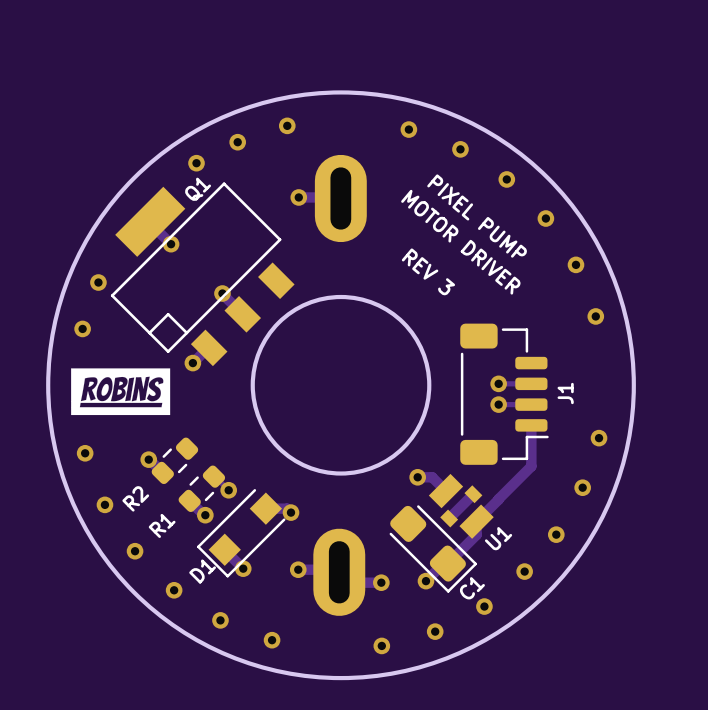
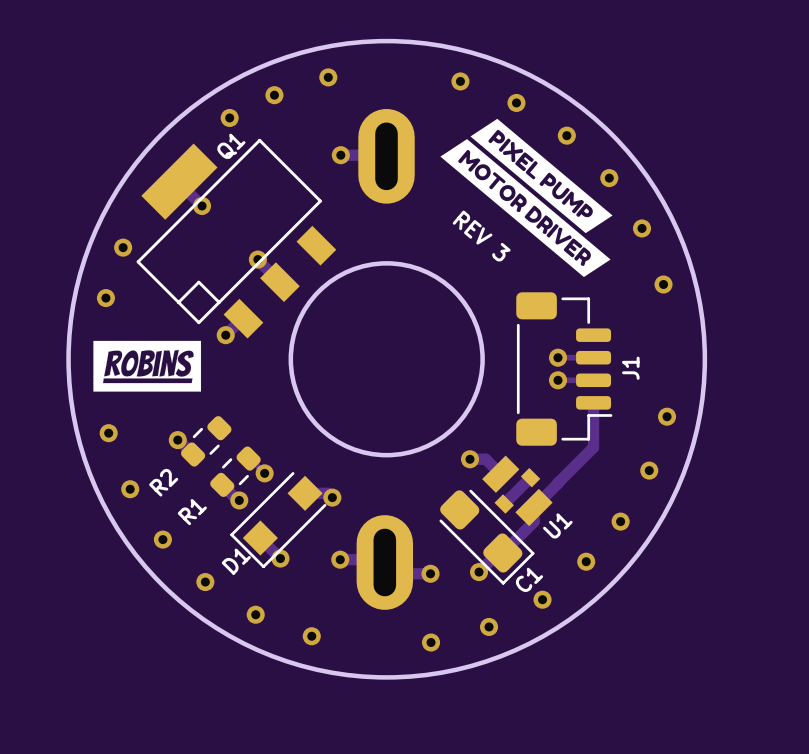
drawing: none -> [440, 118, 613, 278]
text: PIXEL PUMP (477, 216) -> none
text: MOTOR DRIVER (460, 242) -> none

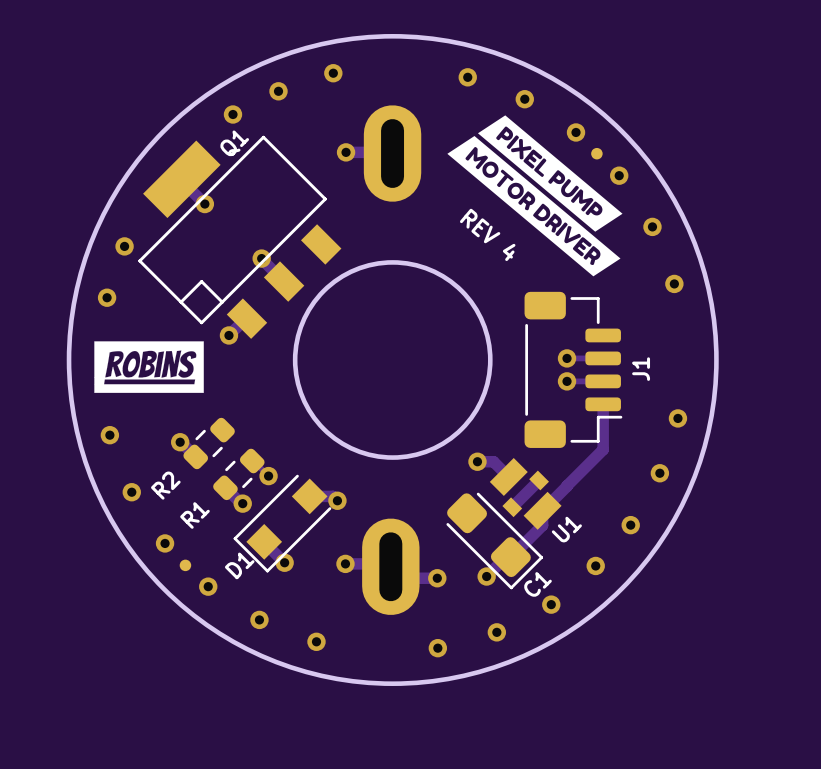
part: none -> (596, 153)
text: REV 3 (481, 236) -> REV 4 (487, 234)
part: none -> (185, 565)

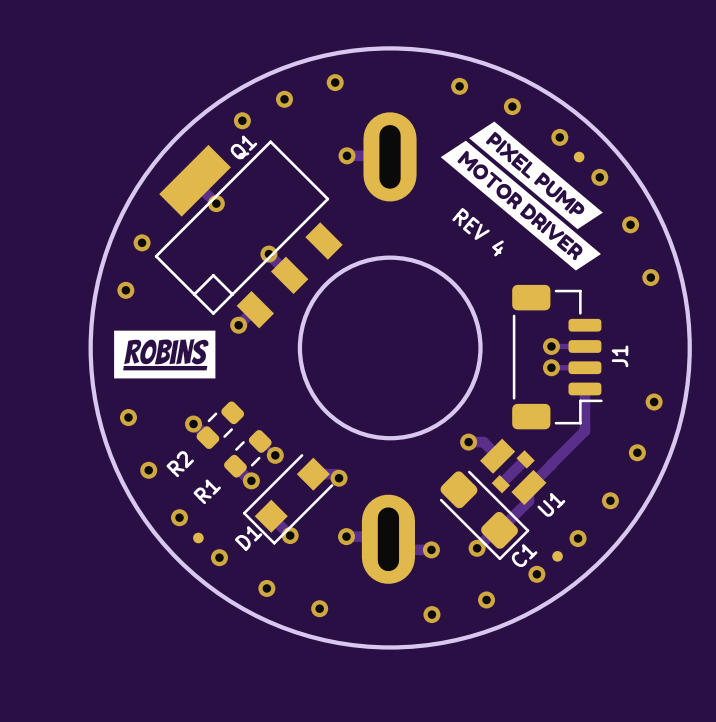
part: none -> (557, 556)

